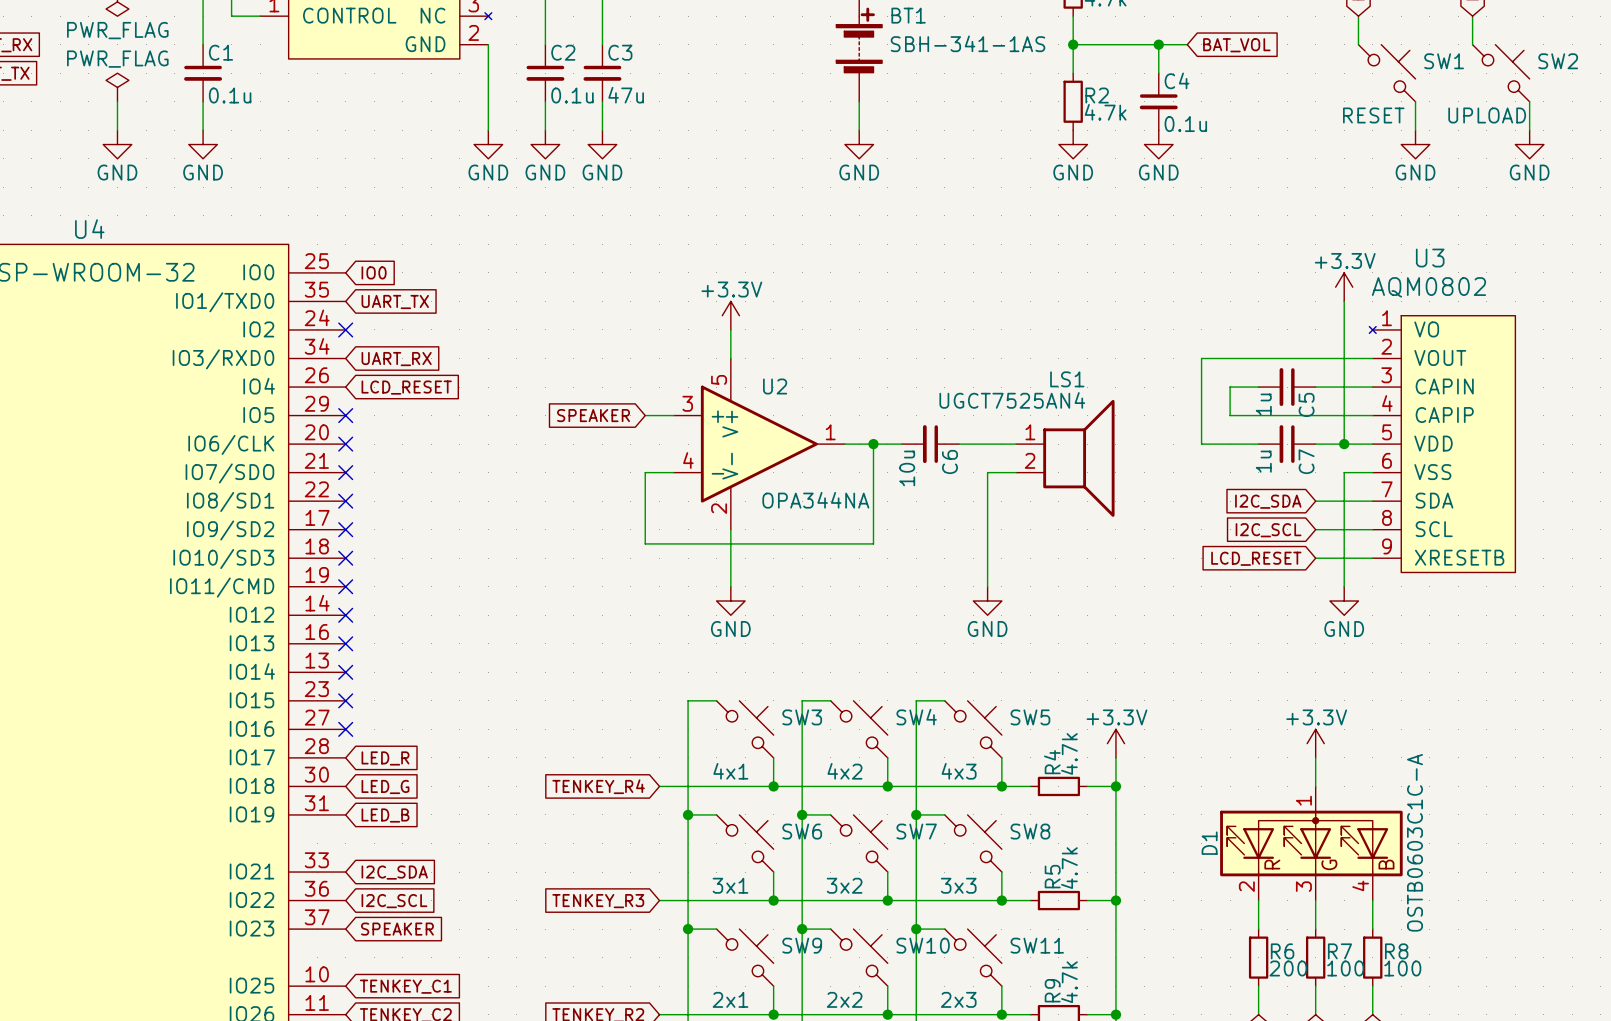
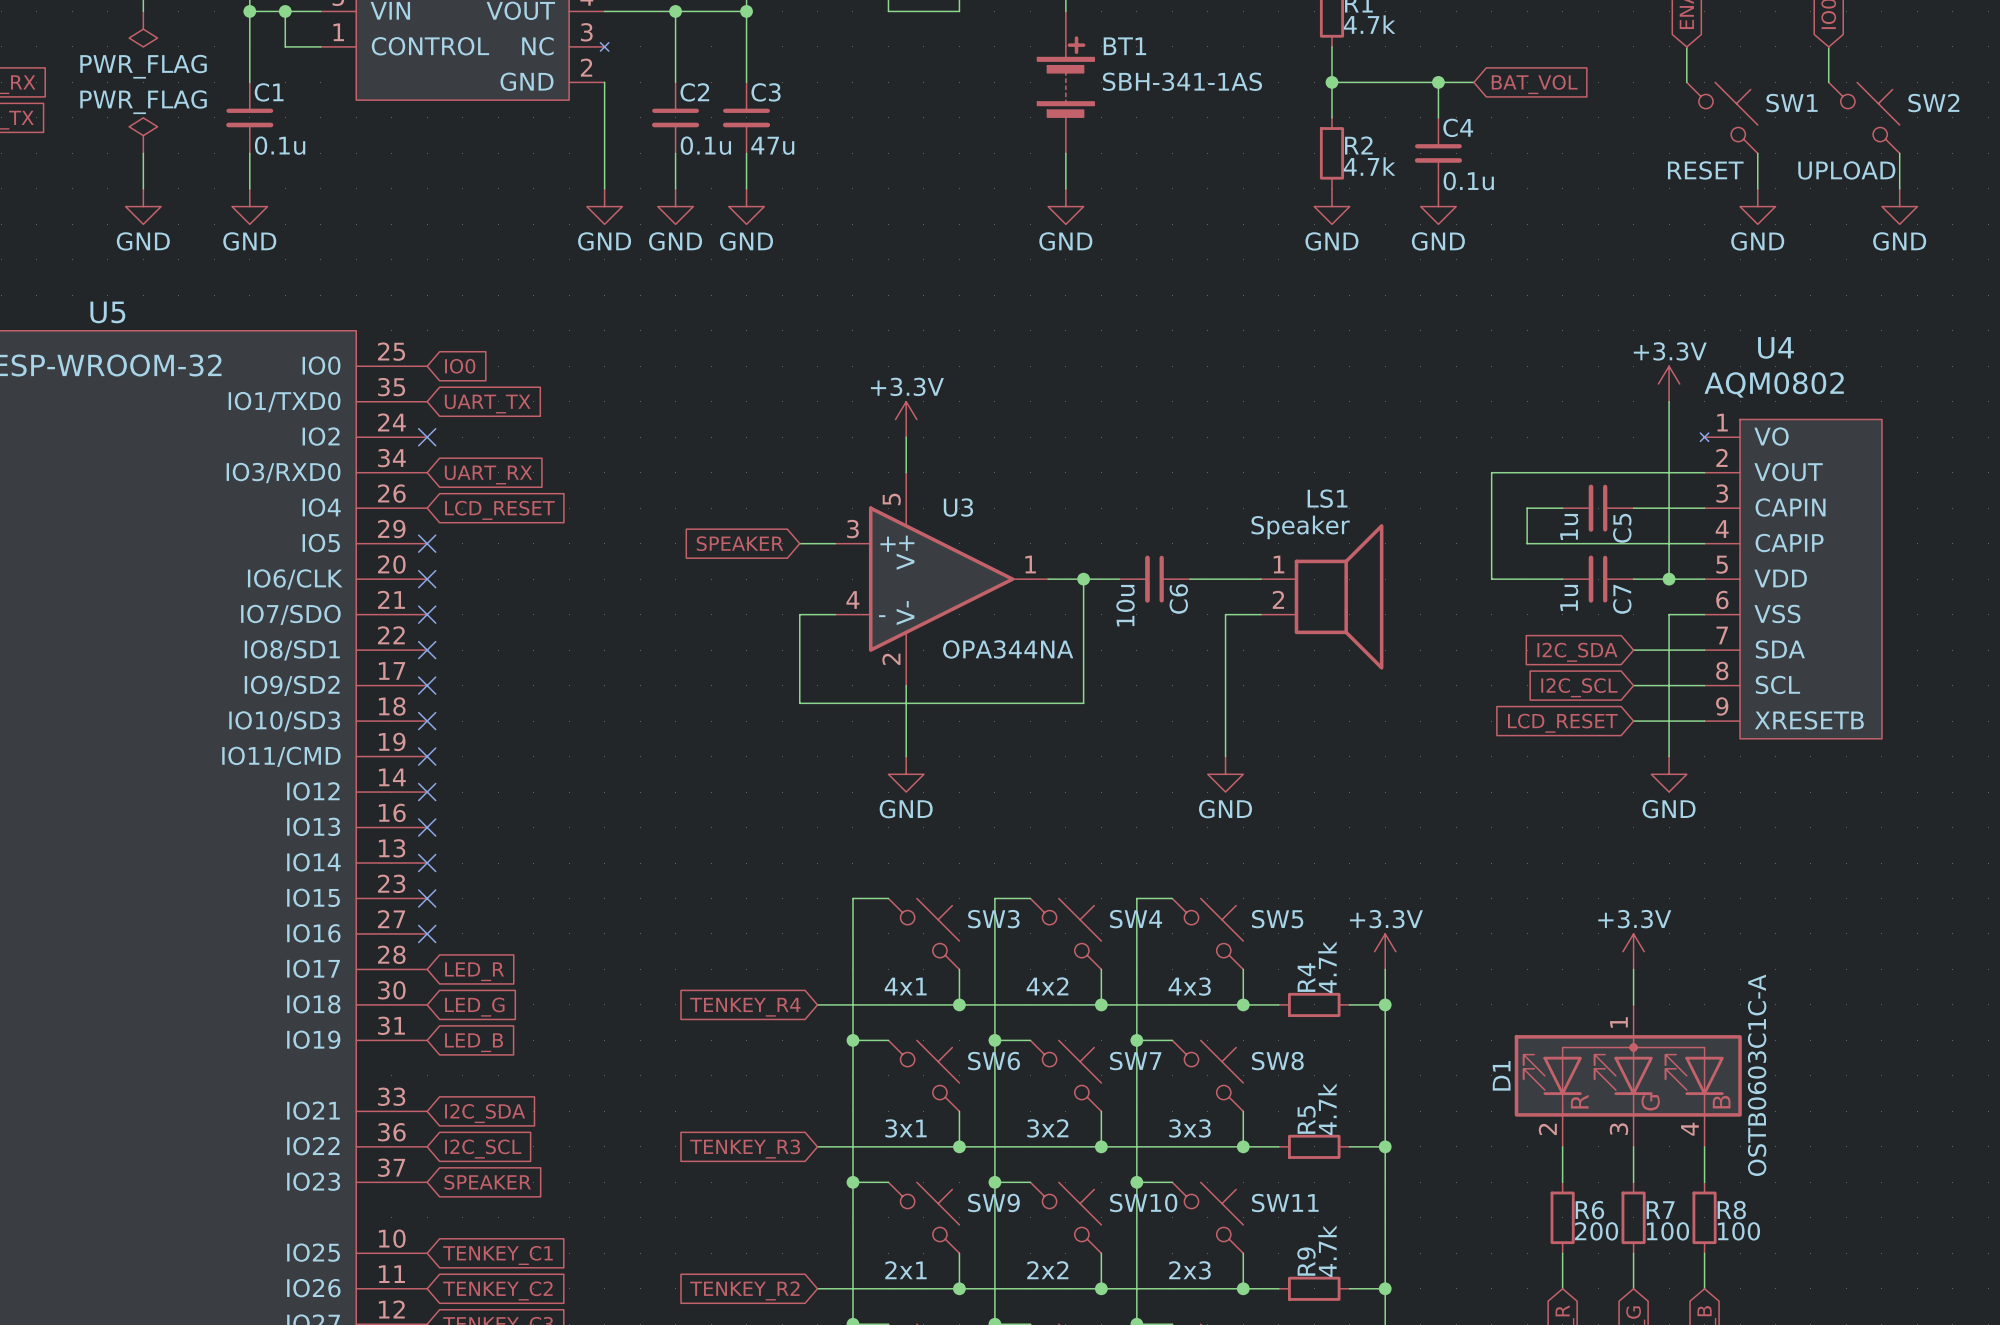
U4 name: U4 (89, 229) -> U5 (107, 312)
U3 name: U3 (1430, 258) -> U4 (1775, 347)
U2 name: U2 (775, 386) -> U3 (958, 507)
LS1 value: UGCT7525AN4 (1012, 400) -> Speaker (1300, 527)

